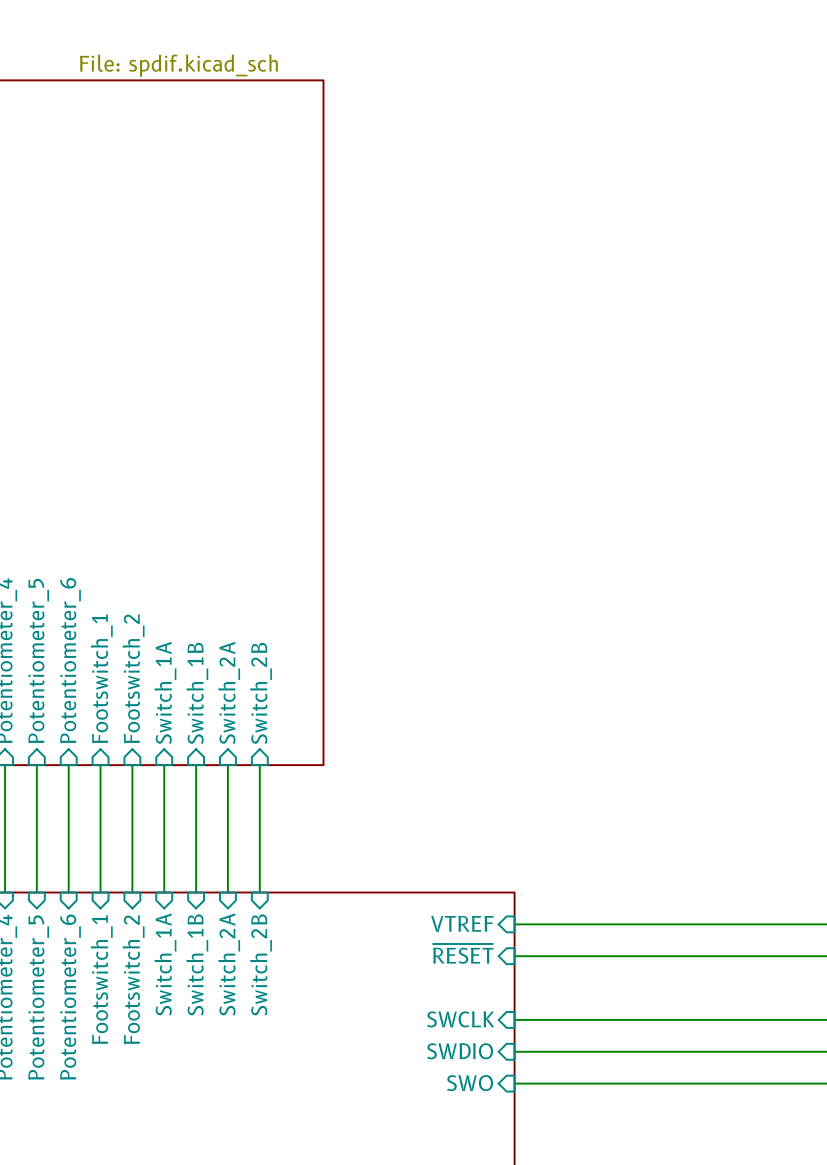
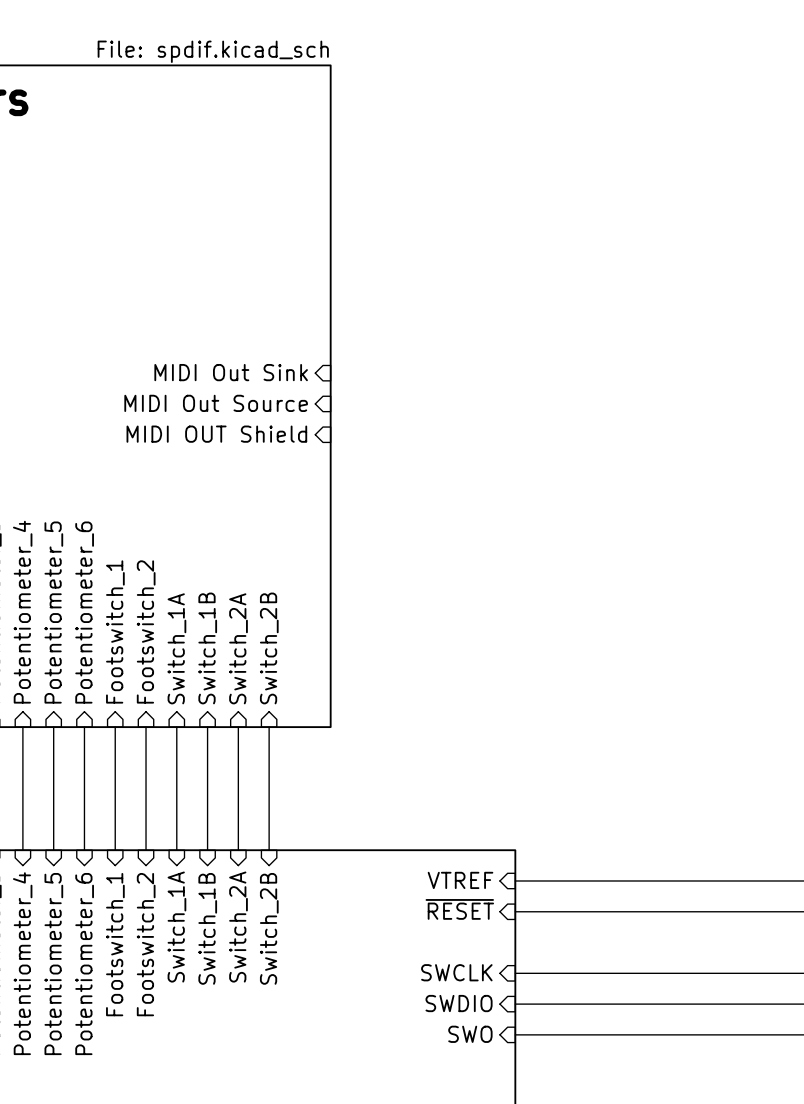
sheet pin: none -> MIDI Out Sink (231, 372)
sheet pin: none -> MIDI Out Source (216, 403)
sheet pin: none -> MIDI OUT Shield (216, 434)

